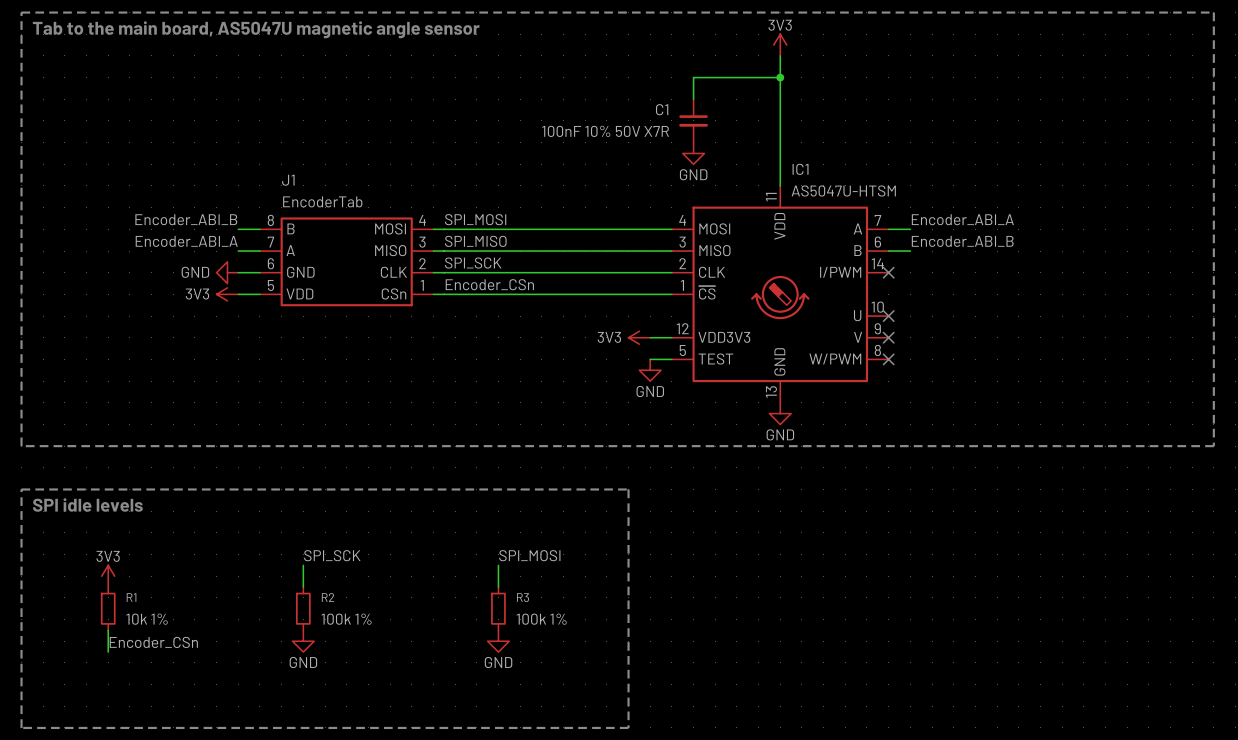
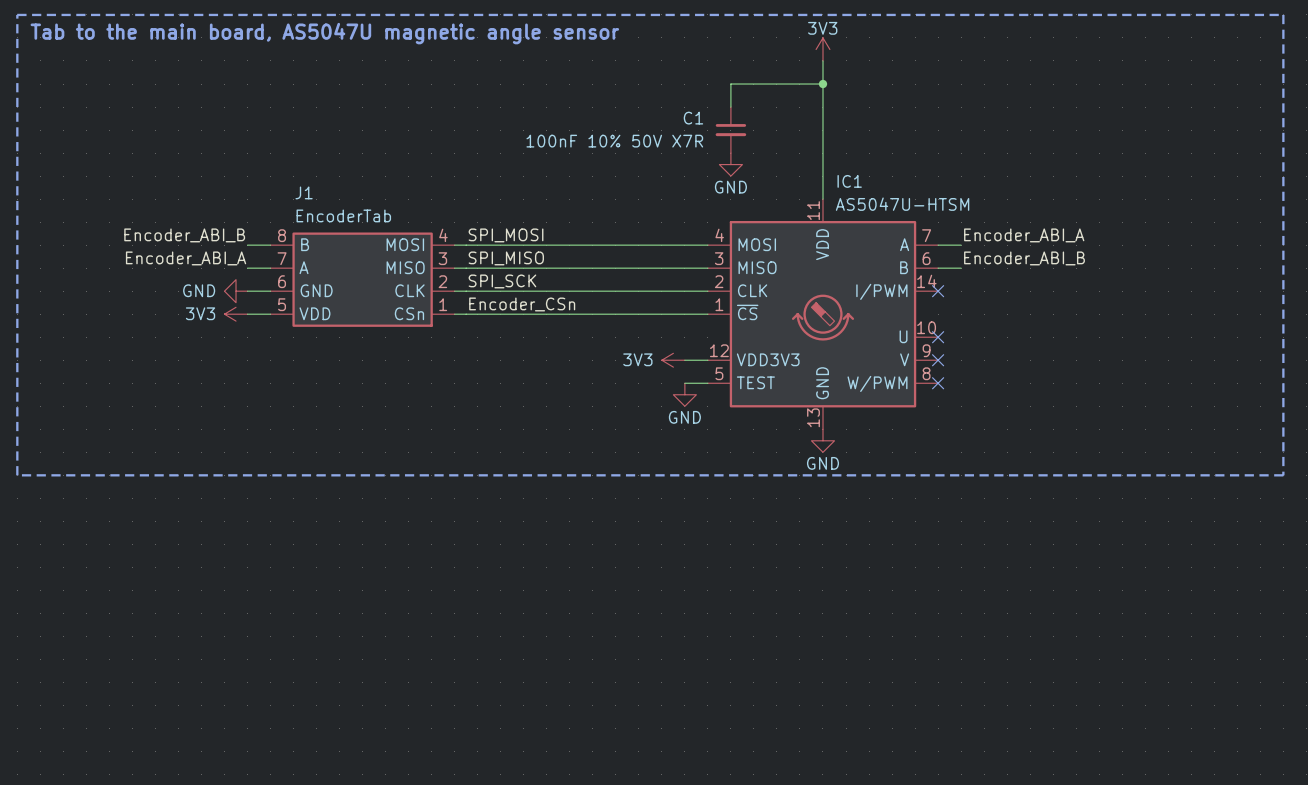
line: (21, 489) (628, 489) (628, 727) (21, 727) (21, 489) -> none
text: SPI idle levels (87, 505) -> none
label: SPI_SCK (332, 555) -> none
label: SPI_MOSI (529, 555) -> none
wire: (303, 565) (303, 587) -> none
wire: (498, 565) (498, 587) -> none
power symbol: 3V3 (108, 576) -> none
R1: 10k 1% (108, 608) -> none
R2: 100k 1% (303, 608) -> none
R3: 100k 1% (498, 608) -> none
wire: (108, 630) (108, 652) -> none
power symbol: GND (303, 641) -> none
power symbol: GND (498, 641) -> none
label: Encoder_CSn (153, 642) -> none

